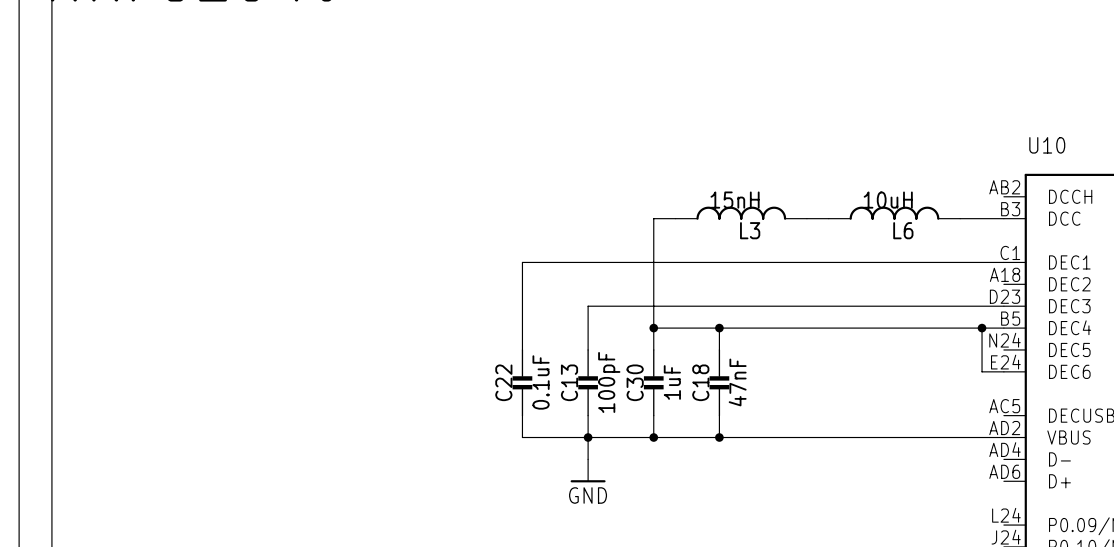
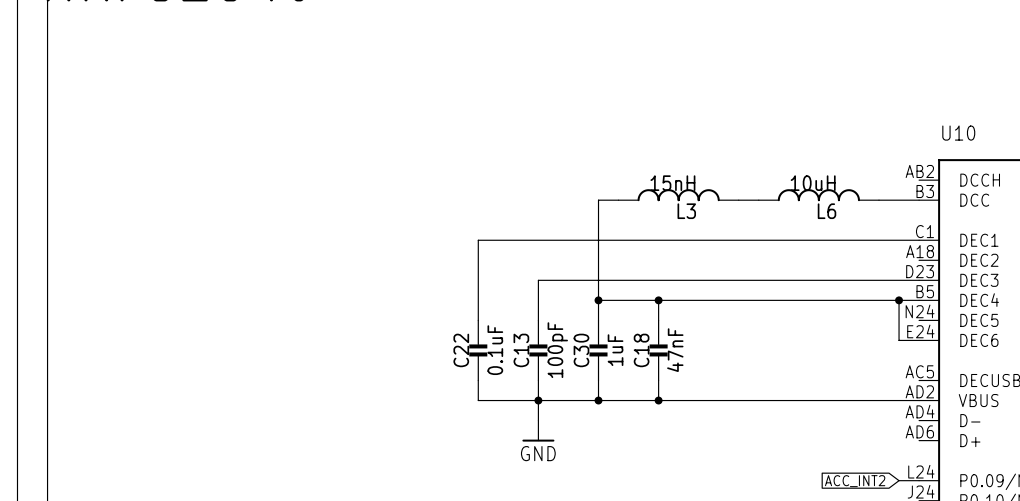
global label: none -> ACC_INT2 (855, 481)
wire: none -> (899, 480) (919, 480)

